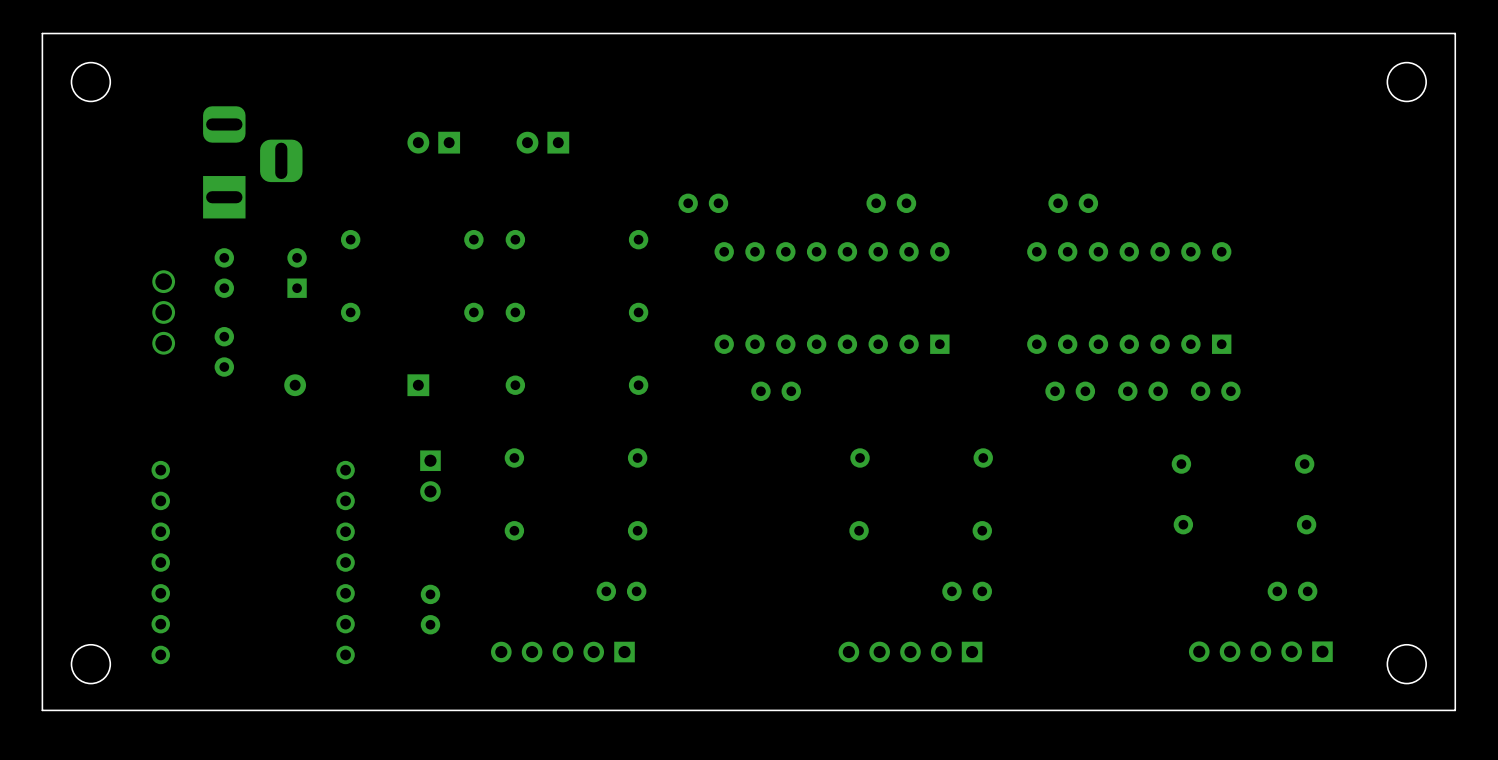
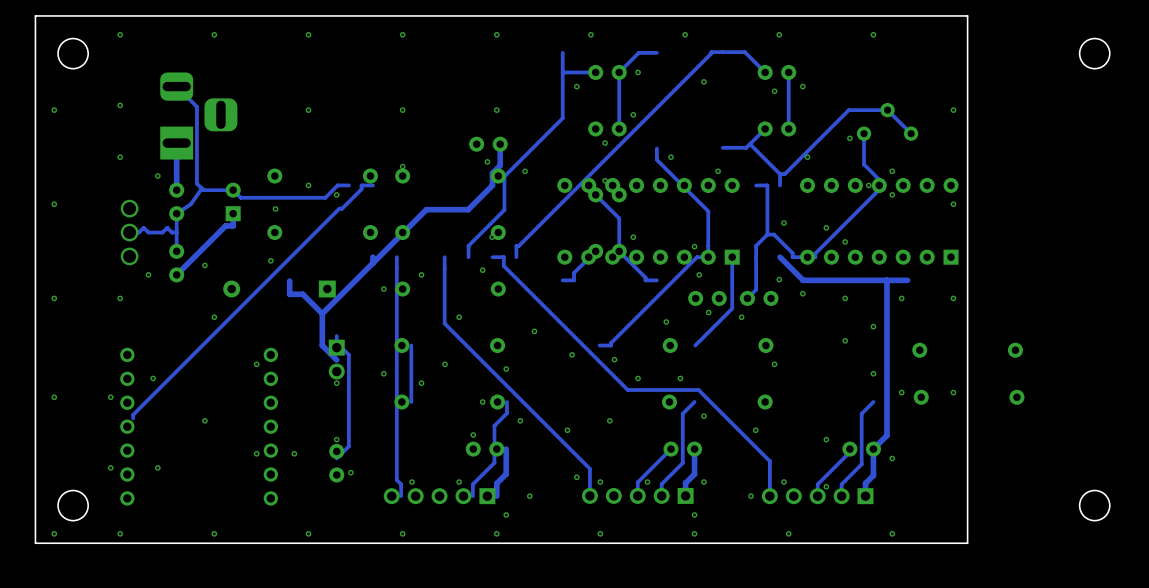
board edge: (1243, 33) (1455, 33) (1455, 710) (42, 710) -> (967, 15) (967, 543) (35, 543) (35, 541)
via: none -> (120, 34)
via: none -> (214, 34)
via: none -> (308, 34)
via: none -> (402, 34)
via: none -> (496, 34)
via: none -> (590, 34)
via: none -> (685, 34)
via: none -> (779, 34)
via: none -> (873, 34)
track: none -> (562, 52) (562, 118) (504, 176) (504, 210) (468, 245) (468, 257)
track: none -> (656, 52) (638, 52) (619, 72) (619, 128)
track: none -> (595, 72) (562, 72)
part: none -> (607, 72)
via: none -> (638, 72)
track: none -> (765, 72) (744, 52) (711, 52) (518, 245) (516, 245) (516, 257)
part: none -> (776, 72)
track: none -> (788, 72) (788, 128)
via: none -> (703, 81)
track: none -> (176, 86) (196, 106) (196, 183) (203, 190) (233, 190) (240, 197) (325, 197) (337, 185) (348, 185)
via: none -> (576, 86)
via: none -> (802, 86)
via: none -> (774, 91)
part: (433, 142) -> none
part: (542, 142) -> none
via: none -> (120, 105)
via: none -> (54, 110)
via: none -> (308, 110)
via: none -> (402, 110)
via: none -> (496, 110)
via: none -> (953, 110)
via: none -> (633, 114)
part: none -> (887, 121)
part: none -> (607, 128)
track: none -> (765, 128) (750, 144)
part: none -> (776, 128)
track: none -> (864, 133) (864, 164) (884, 184) (815, 253) (815, 257) (792, 257) (792, 253) (774, 234) (767, 234)
track: none -> (911, 133) (887, 110) (848, 110) (784, 174) (780, 174)
via: none -> (849, 138)
track: none -> (176, 143) (176, 190)
via: none -> (605, 143)
part: none -> (488, 144)
track: none -> (500, 144) (500, 165) (492, 173) (492, 185) (468, 209) (426, 209) (322, 313)
track: none -> (750, 144) (746, 147) (722, 147)
track: none -> (750, 144) (780, 174)
part: (703, 203) -> none
part: (891, 203) -> none
part: (1073, 203) -> none
track: none -> (656, 148) (656, 159) (708, 211) (708, 257) (696, 257) (610, 343) (610, 345) (599, 345)
via: none -> (120, 157)
via: none -> (671, 157)
via: none -> (807, 157)
via: none -> (487, 161)
via: none -> (402, 166)
via: none -> (525, 171)
via: none -> (718, 171)
via: none -> (892, 171)
track: none -> (780, 174) (780, 185)
via: none -> (157, 176)
via: none -> (605, 180)
via: none -> (308, 185)
track: none -> (372, 185) (361, 185) (361, 189) (342, 208) (339, 208) (133, 414) (133, 418)
track: none -> (756, 185) (767, 185) (767, 234)
via: none -> (868, 185)
track: none -> (201, 188) (190, 204) (176, 213) (176, 251)
via: none -> (336, 194)
track: none -> (595, 194) (619, 218) (619, 251) (645, 277) (645, 280) (656, 280)
part: none -> (607, 194)
via: none -> (892, 194)
via: none -> (54, 204)
via: none -> (953, 204)
via: none -> (275, 208)
track: none -> (233, 213) (233, 225) (225, 225) (176, 274)
via: none -> (783, 223)
via: none -> (826, 227)
track: none -> (176, 232) (171, 232) (167, 227) (162, 232) (148, 232) (143, 227) (139, 232) (129, 232)
track: none -> (767, 234) (756, 245) (756, 289) (747, 298)
via: none -> (492, 237)
via: none -> (633, 237)
via: none -> (845, 241)
via: none -> (694, 246)
track: none -> (595, 251) (574, 273) (574, 280) (562, 280)
track: none -> (372, 257) (372, 263)
track: none -> (396, 257) (396, 480) (401, 484) (401, 496)
track: none -> (444, 257) (444, 323) (589, 468) (589, 495)
track: none -> (492, 257) (503, 257) (503, 266) (627, 390) (698, 390) (769, 461) (769, 496)
track: none -> (732, 257) (732, 308) (695, 345)
track: none -> (780, 257) (803, 280) (907, 280)
via: none -> (270, 260)
via: none -> (204, 265)
via: none -> (482, 270)
via: none -> (148, 274)
via: none -> (421, 274)
via: none -> (699, 274)
via: none -> (779, 279)
track: none -> (886, 280) (886, 435) (873, 449) (873, 475) (865, 483) (865, 496)
track: none -> (289, 281) (289, 294) (302, 294) (322, 313)
via: none -> (383, 289)
part position: (776, 391) -> (607, 251)
via: none -> (802, 293)
part: (1070, 391) -> none
part: (1142, 391) -> none
part: (1215, 391) -> none
via: none -> (54, 298)
via: none -> (120, 298)
part: none -> (707, 298)
part: none -> (759, 298)
via: none -> (845, 298)
via: none -> (901, 298)
via: none -> (953, 298)
via: none -> (708, 312)
track: none -> (322, 313) (322, 345) (336, 360)
via: none -> (214, 317)
via: none -> (459, 317)
via: none -> (741, 317)
via: none -> (666, 321)
via: none -> (873, 326)
via: none -> (534, 331)
track: none -> (336, 336) (336, 347) (341, 347) (348, 354) (348, 446) (336, 458)
via: none -> (845, 340)
track: none -> (411, 345) (411, 402)
via: none -> (572, 354)
via: none -> (614, 359)
via: none -> (256, 364)
via: none -> (445, 364)
via: none -> (774, 364)
via: none -> (506, 369)
via: none -> (383, 373)
via: none -> (873, 373)
via: none -> (153, 378)
via: none -> (638, 378)
via: none -> (680, 378)
via: none -> (336, 383)
via: none -> (421, 383)
via: none -> (901, 392)
via: none -> (953, 392)
via: none -> (54, 397)
via: none -> (110, 397)
via: none -> (482, 402)
track: none -> (506, 402) (506, 413) (494, 425) (494, 462) (472, 484) (472, 496)
track: none -> (694, 402) (682, 413) (682, 463) (661, 484) (661, 495)
track: none -> (873, 402) (861, 413) (861, 464) (841, 484) (841, 496)
via: none -> (703, 416)
via: none -> (204, 420)
via: none -> (520, 420)
via: none -> (609, 420)
via: none -> (567, 430)
via: none -> (755, 430)
via: none -> (473, 434)
via: none -> (336, 439)
via: none -> (826, 439)
track: none -> (506, 449) (506, 474) (496, 483) (496, 496)
track: none -> (671, 449) (637, 482) (637, 495)
part: none -> (682, 449)
track: none -> (694, 449) (694, 474) (685, 483) (685, 495)
part: (967, 591) -> none
track: none -> (849, 449) (849, 452) (817, 484) (817, 496)
part: none -> (861, 449)
part: (1292, 591) -> none
via: none -> (256, 453)
via: none -> (294, 453)
via: none -> (892, 458)
via: none -> (110, 467)
via: none -> (157, 467)
via: none -> (350, 472)
via: none -> (576, 477)
via: none -> (412, 482)
via: none -> (459, 482)
via: none -> (600, 482)
via: none -> (647, 482)
via: none -> (703, 482)
via: none -> (783, 482)
via: none -> (826, 486)
part: none -> (637, 495)
part: (1260, 651) -> none
via: none -> (529, 496)
part: (910, 652) -> none
via: none -> (751, 496)
part: none -> (817, 496)
via: none -> (506, 514)
via: none -> (694, 514)
via: none -> (54, 533)
via: none -> (120, 533)
via: none -> (214, 533)
via: none -> (308, 533)
via: none -> (402, 533)
via: none -> (496, 533)
via: none -> (600, 533)
via: none -> (694, 533)
via: none -> (788, 533)
via: none -> (892, 533)

